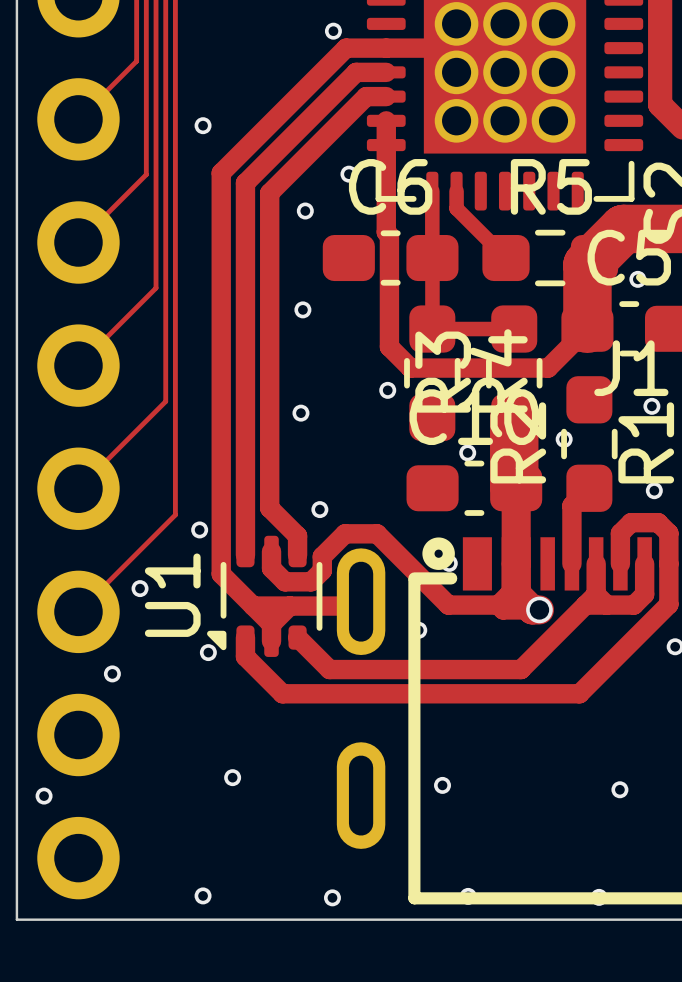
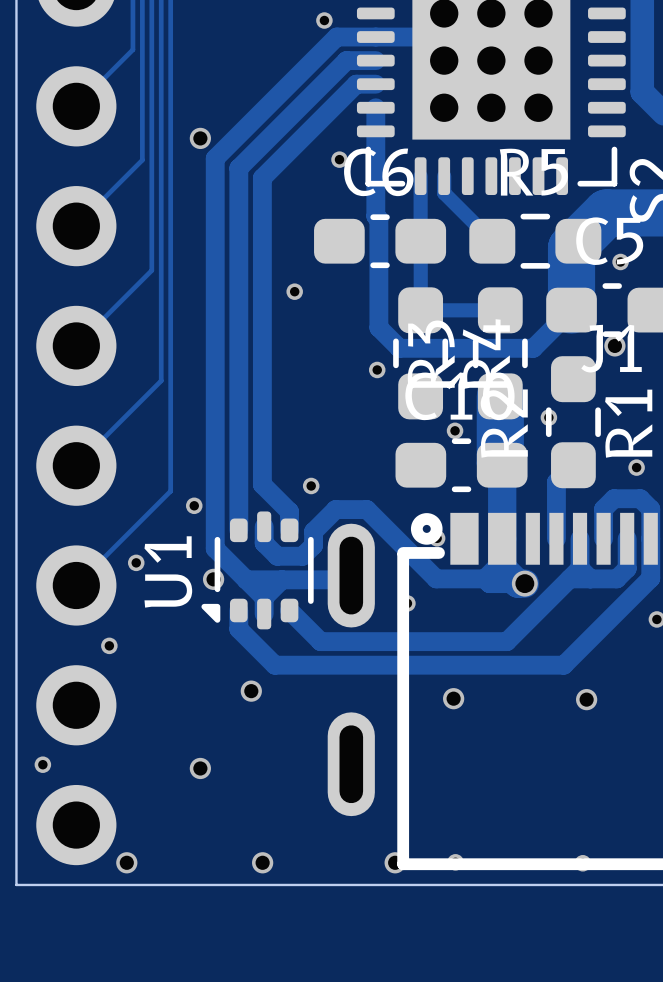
via: (203, 125) -> none
via: none -> (200, 138)
via: (305, 211) -> none
via: none -> (614, 345)
via: (651, 406) -> none
via: (300, 413) -> none
via: none -> (213, 579)
via: (208, 652) -> none
via: none -> (251, 691)
via: none -> (453, 698)
via: none -> (586, 699)
via: (232, 777) -> none
via: (442, 785) -> none
via: (619, 789) -> none
via: none -> (200, 768)
via: (203, 895) -> none
via: none -> (126, 862)
via: none -> (262, 862)
via: none -> (395, 862)
via: (332, 897) -> none

